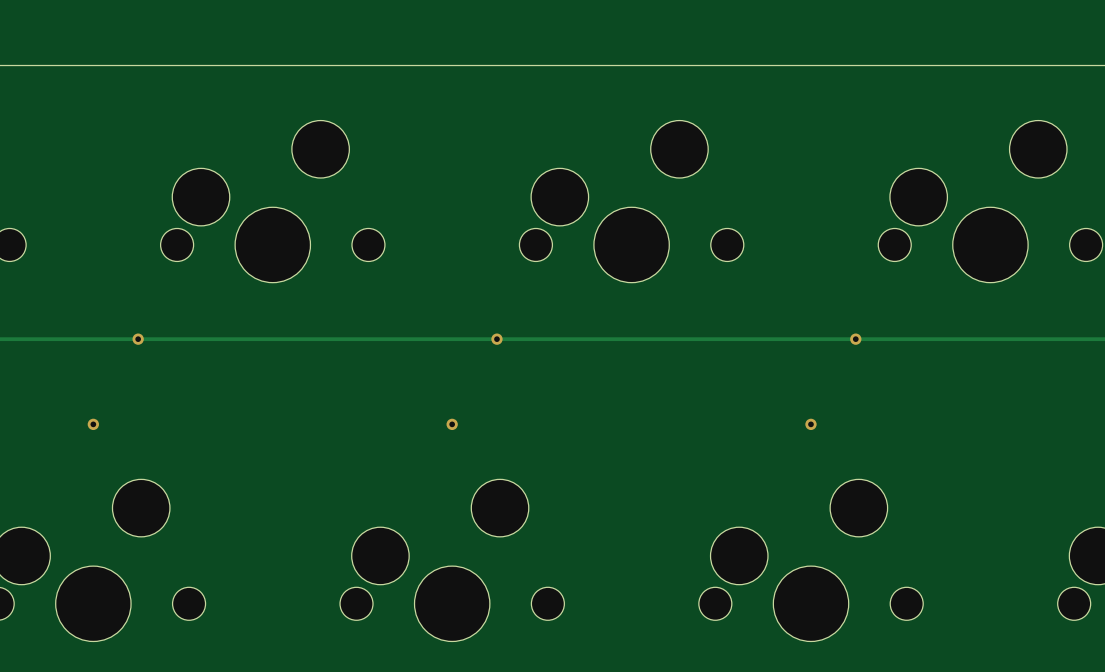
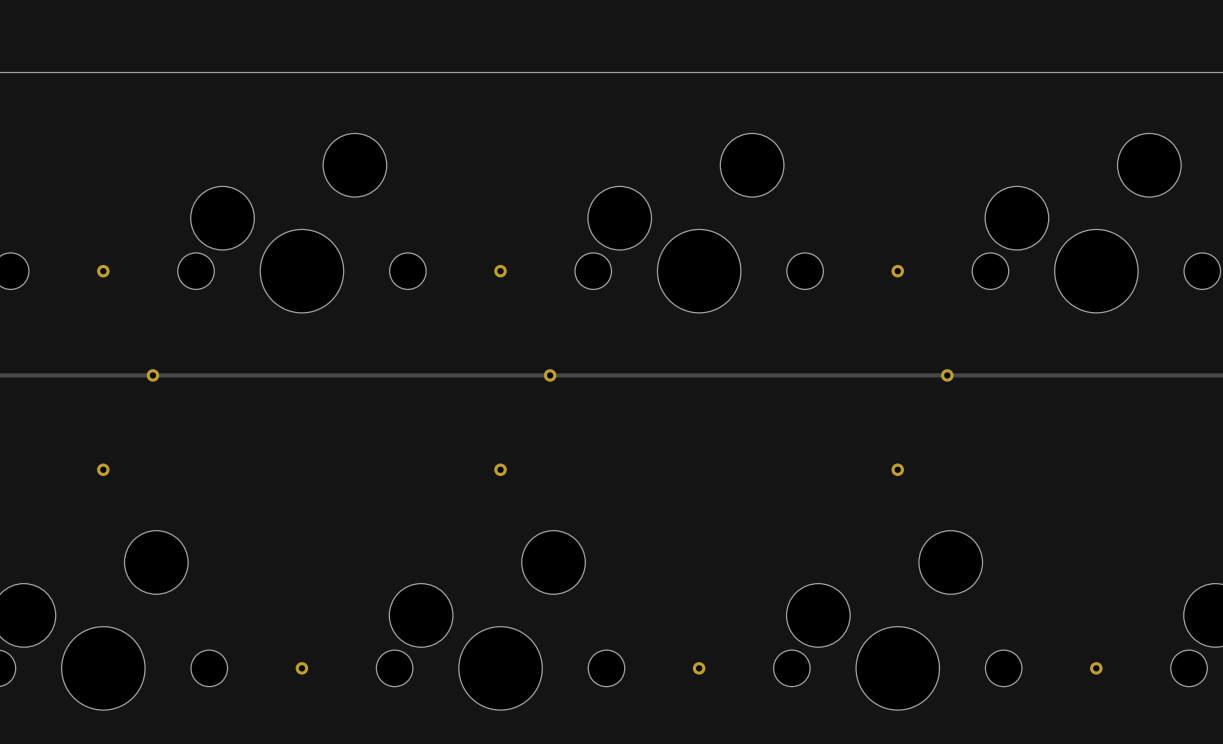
via: none -> (103, 271)
via: none -> (500, 271)
via: none -> (897, 271)
via: none -> (301, 668)
via: none -> (699, 668)
via: none -> (1096, 668)

